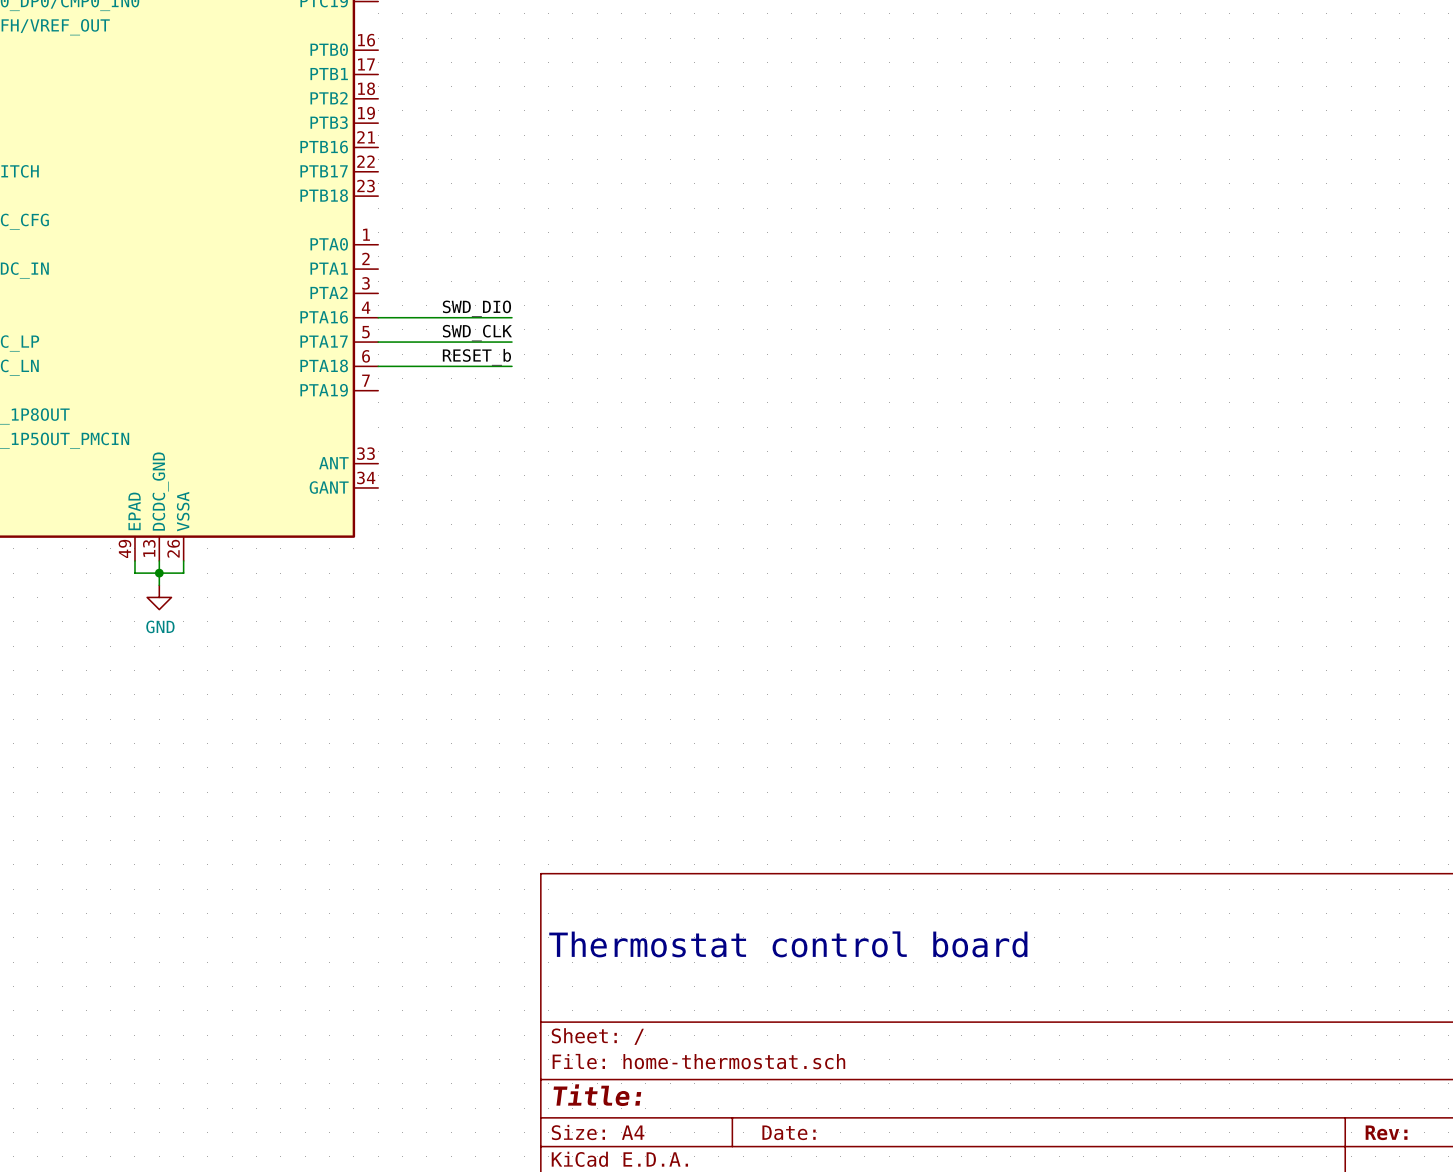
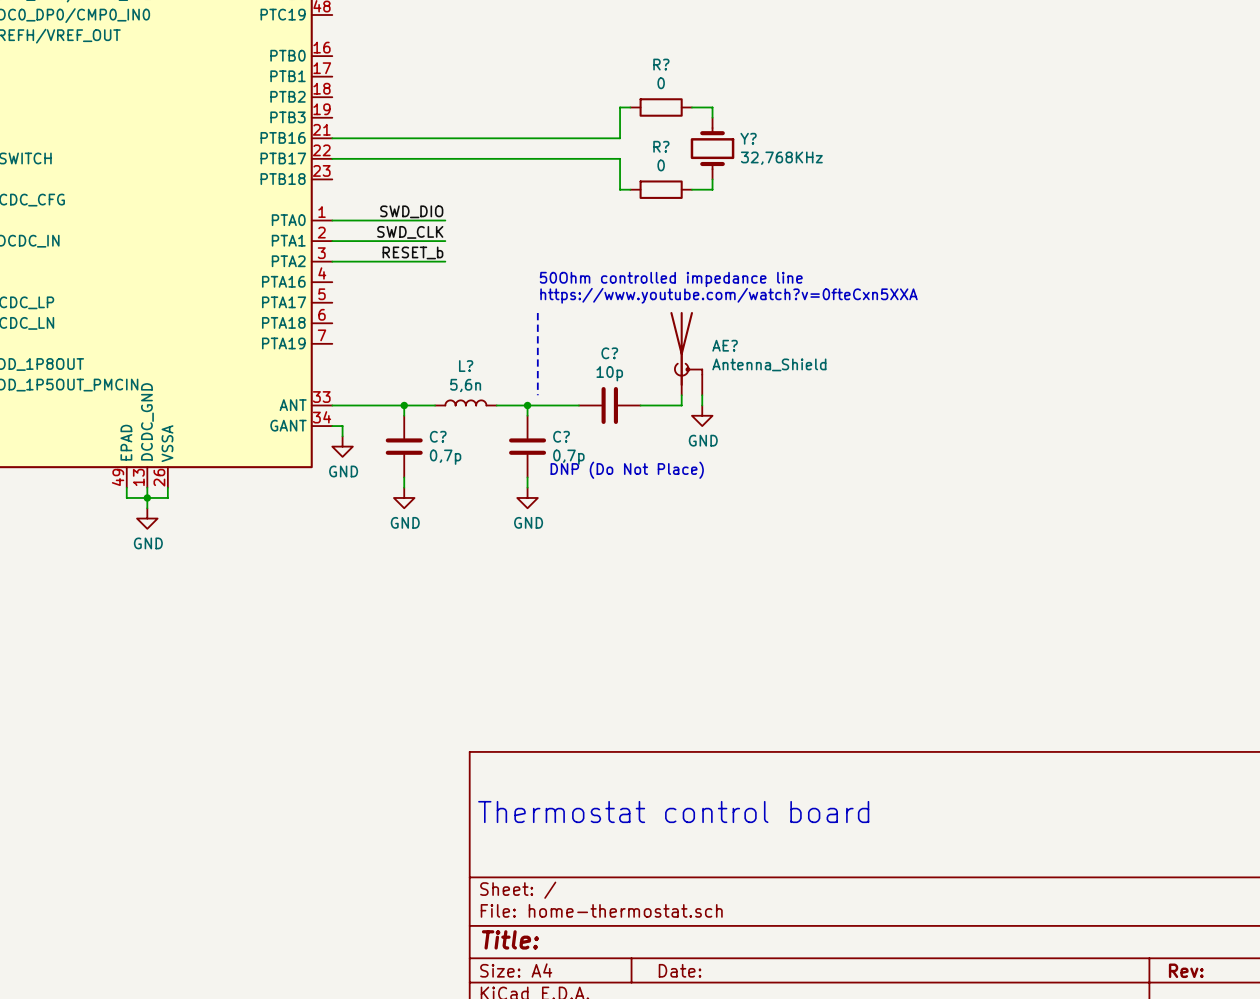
wire: none -> (630, 107) (620, 107) (620, 138) (332, 138)
R?: none -> 0 (661, 107)
wire: none -> (691, 107) (712, 107) (712, 117)
Y?: none -> 32,768KHz (712, 148)
wire: none -> (332, 158) (620, 158) (620, 189) (630, 189)
wire: none -> (712, 179) (712, 189) (691, 189)
R?: none -> 0 (661, 189)
label position: SWD_DIO (476, 308) -> SWD_DIO (411, 211)
text: none -> 50Ohm controlled impedance line (671, 279)
wire: (378, 317) (511, 317) -> (332, 220) (445, 220)
label position: SWD_CLK (477, 333) -> SWD_CLK (410, 232)
text: none -> https://www.youtube.com/watch?v=0fteCxn5XXA (728, 295)
wire: (378, 342) (511, 342) -> (332, 241) (445, 241)
line: none -> (537, 313) (537, 395)
label position: RESET_b (476, 357) -> RESET_b (412, 252)
wire: (378, 366) (511, 366) -> (332, 261) (445, 261)
AE?: none -> Antenna_Shield (686, 353)
wire: none -> (681, 395) (681, 405) (640, 405)
wire: none -> (702, 395) (702, 405)
L?: none -> 5,6n (465, 402)
wire: none -> (332, 405) (435, 405)
wire: none -> (404, 405) (404, 415)
junction: none -> (404, 405)
wire: none -> (496, 405) (578, 405)
wire: none -> (527, 405) (527, 415)
junction: none -> (527, 405)
C?: none -> 10p (609, 405)
power symbol: none -> GND (702, 415)
wire: none -> (332, 426) (342, 426) (342, 436)
power symbol: none -> GND (342, 446)
C?: none -> 0,7p (404, 446)
C?: none -> 0,7p (527, 446)
text: none -> DNP (Do Not Place) (627, 470)
wire: none -> (404, 477) (404, 487)
wire: none -> (527, 477) (527, 487)
power symbol: none -> GND (404, 497)
power symbol: none -> GND (527, 497)

